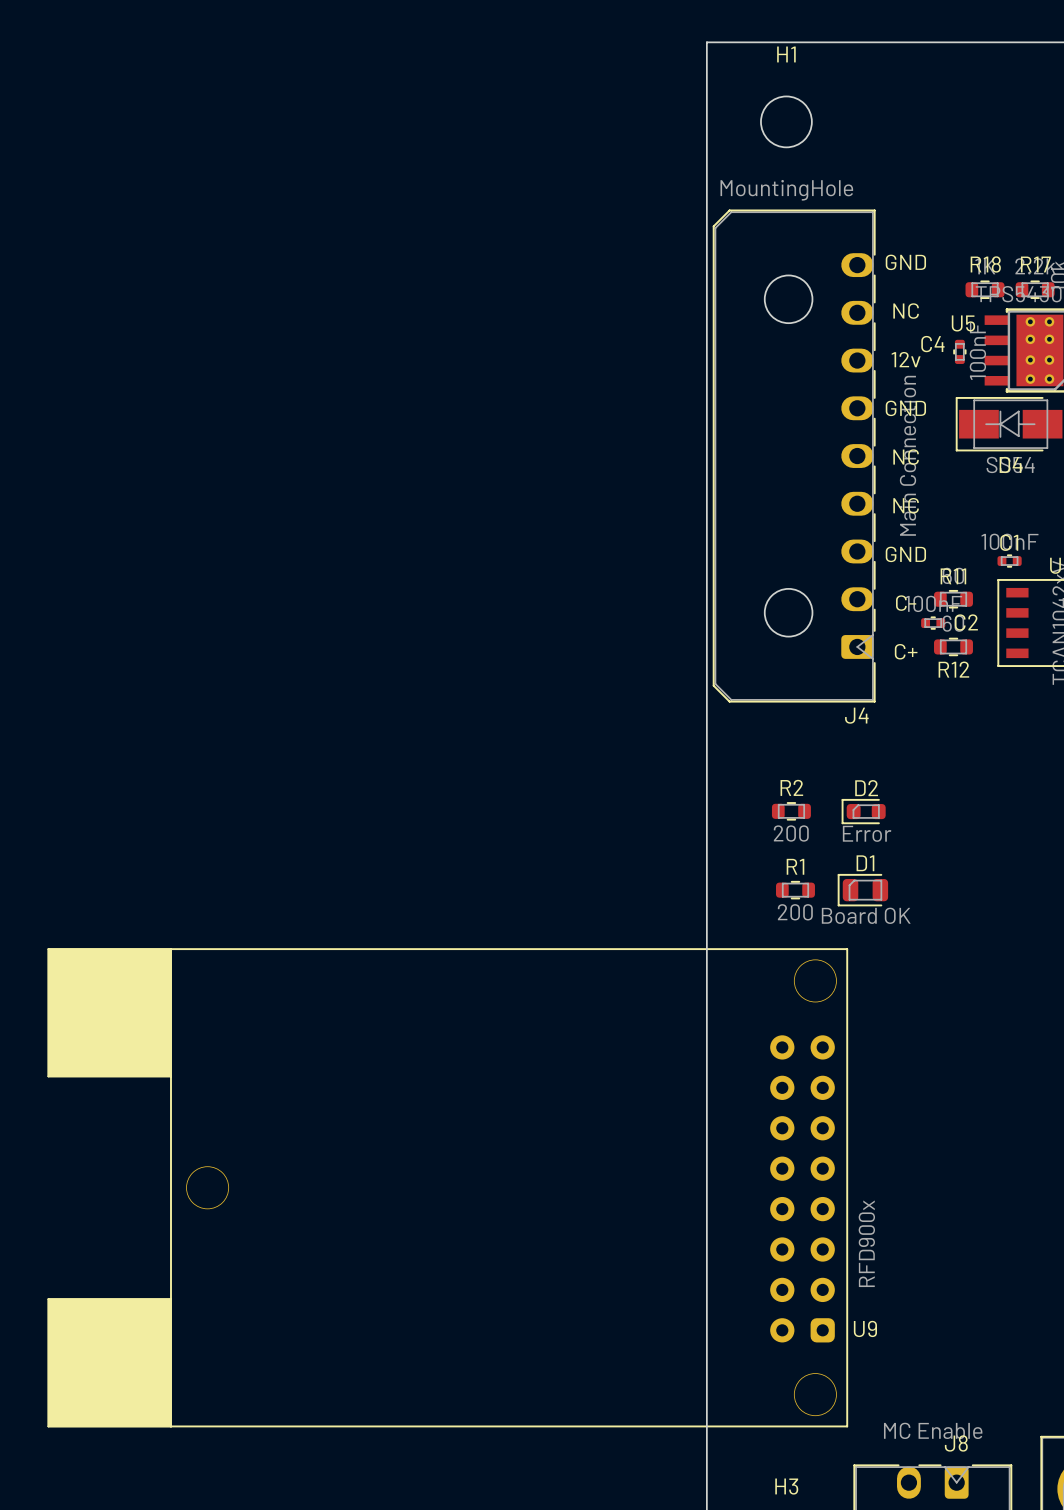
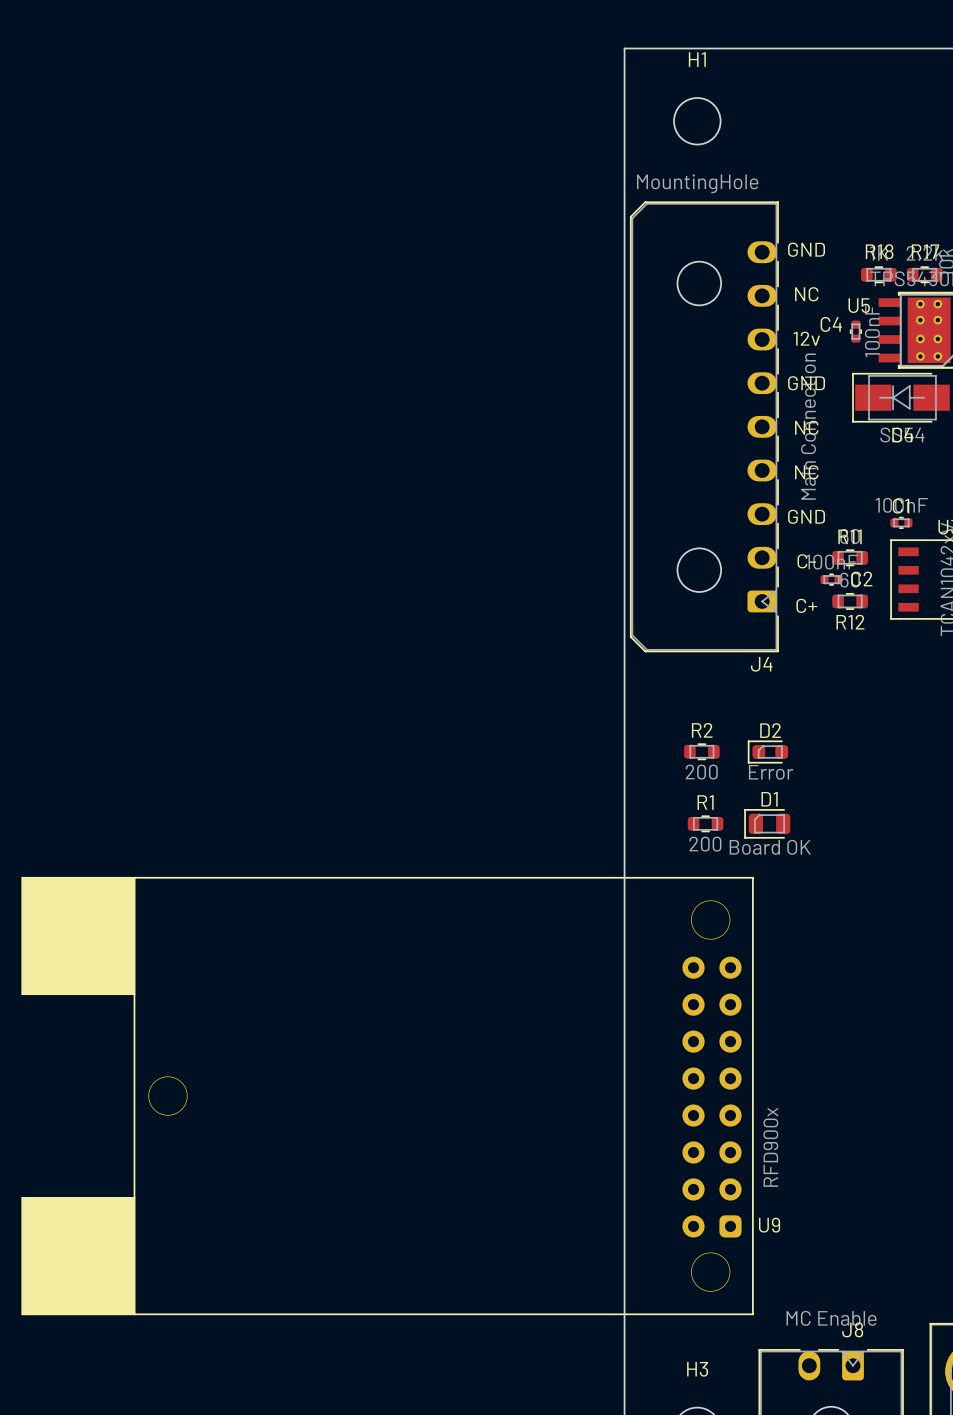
U9 footprint: [47, 948, 849, 1428] -> [21, 876, 754, 1316]

